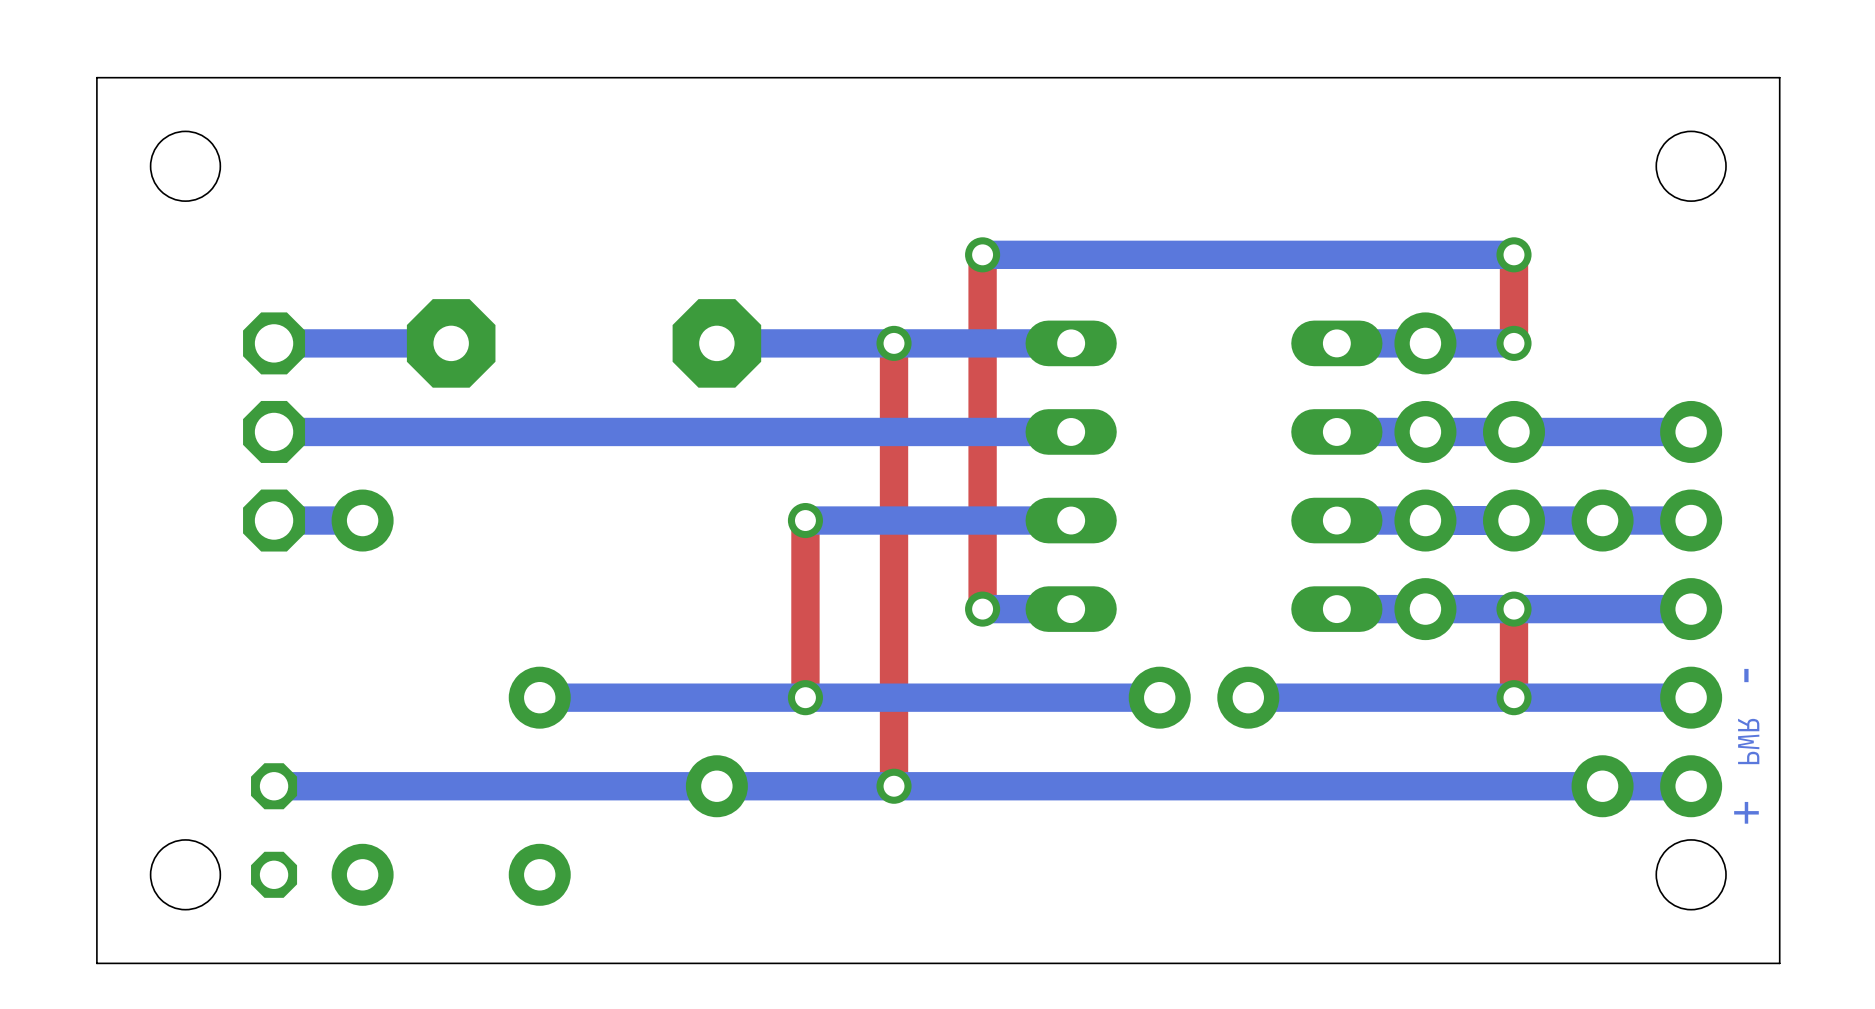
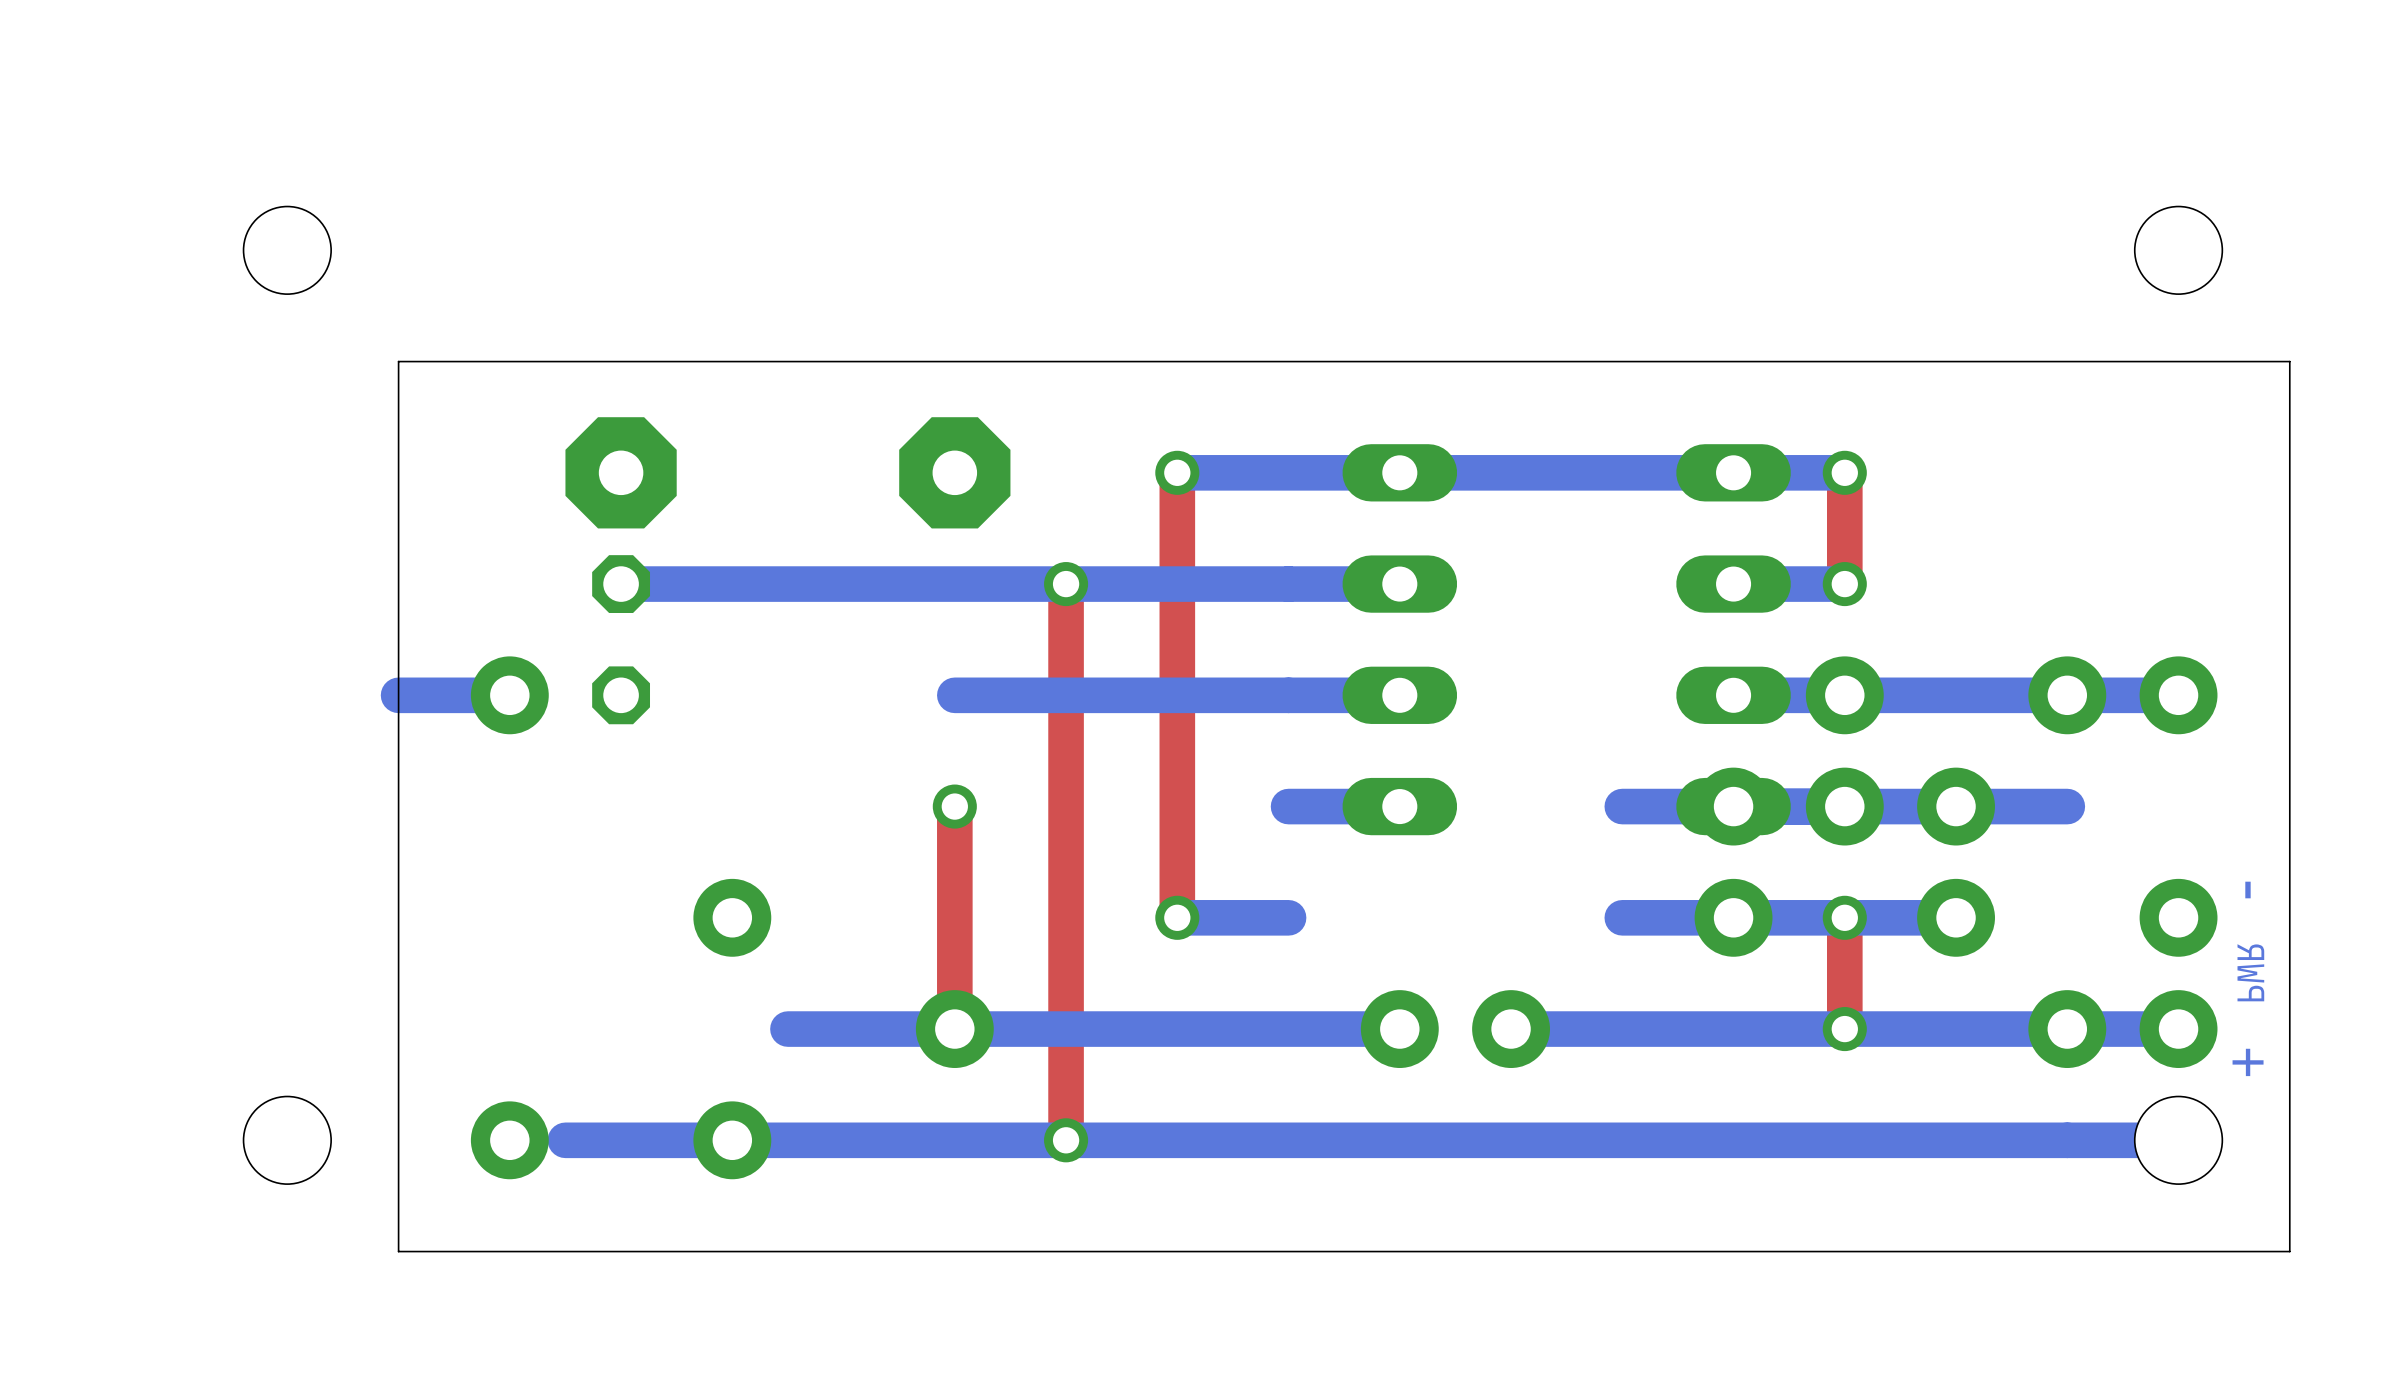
top track: (982, 254) (982, 609) -> none
via: (982, 254) -> none
bottom track: (1514, 254) (982, 254) -> none
top track: (1514, 254) (1514, 343) -> (1844, 472) (1844, 584)
via: (1514, 254) -> none
board edge: (1779, 254) (1779, 77) (96, 77) (96, 963) (274, 963) -> (2289, 361) (398, 361) (398, 1251)
bottom track: (451, 343) (274, 343) -> none
bottom track: (894, 343) (716, 343) -> none
via: none -> (1844, 472)
bottom track: (1514, 343) (1425, 343) -> (1066, 695) (954, 695)
via: (1514, 343) -> none
part: (1425, 387) -> none
part: (274, 431) -> none
bottom track: (451, 431) (274, 431) -> none
via: none -> (1066, 584)
via: none -> (1844, 584)
bottom track: (1691, 431) (1425, 431) -> (1733, 472) (1399, 472)
part position: (1691, 431) -> (2178, 695)
part: (1514, 476) -> none
via: (805, 520) -> none
part: (1691, 564) -> none
top track: none -> (954, 806) (954, 1029)
via: none -> (954, 806)
via: (982, 609) -> none
top track: (1514, 609) (1514, 697) -> (1844, 917) (1844, 1029)
via: (1514, 609) -> none
bottom track: (1691, 609) (1602, 609) -> none
part: none -> (1733, 862)
part: none -> (1956, 862)
top track: none -> (1066, 917) (1066, 1140)
via: (805, 697) -> none
bottom track: (894, 697) (539, 697) -> none
top track: (894, 697) (894, 786) -> (1066, 584) (1066, 695)
via: none -> (1177, 917)
bottom track: (1159, 697) (982, 697) -> none
part: (1204, 697) -> none
via: none -> (1844, 917)
via: (1514, 697) -> none
bottom track: (1691, 697) (1514, 697) -> none
bottom track: (584, 786) (274, 786) -> none
via: (894, 786) -> none
part: none -> (1455, 1029)
bottom track: (1159, 786) (1071, 786) -> (1733, 806) (1622, 806)
via: none -> (1844, 1029)
part position: (274, 830) -> (621, 639)
via: none -> (1066, 1140)
bottom track: none -> (2178, 1140) (565, 1140)

